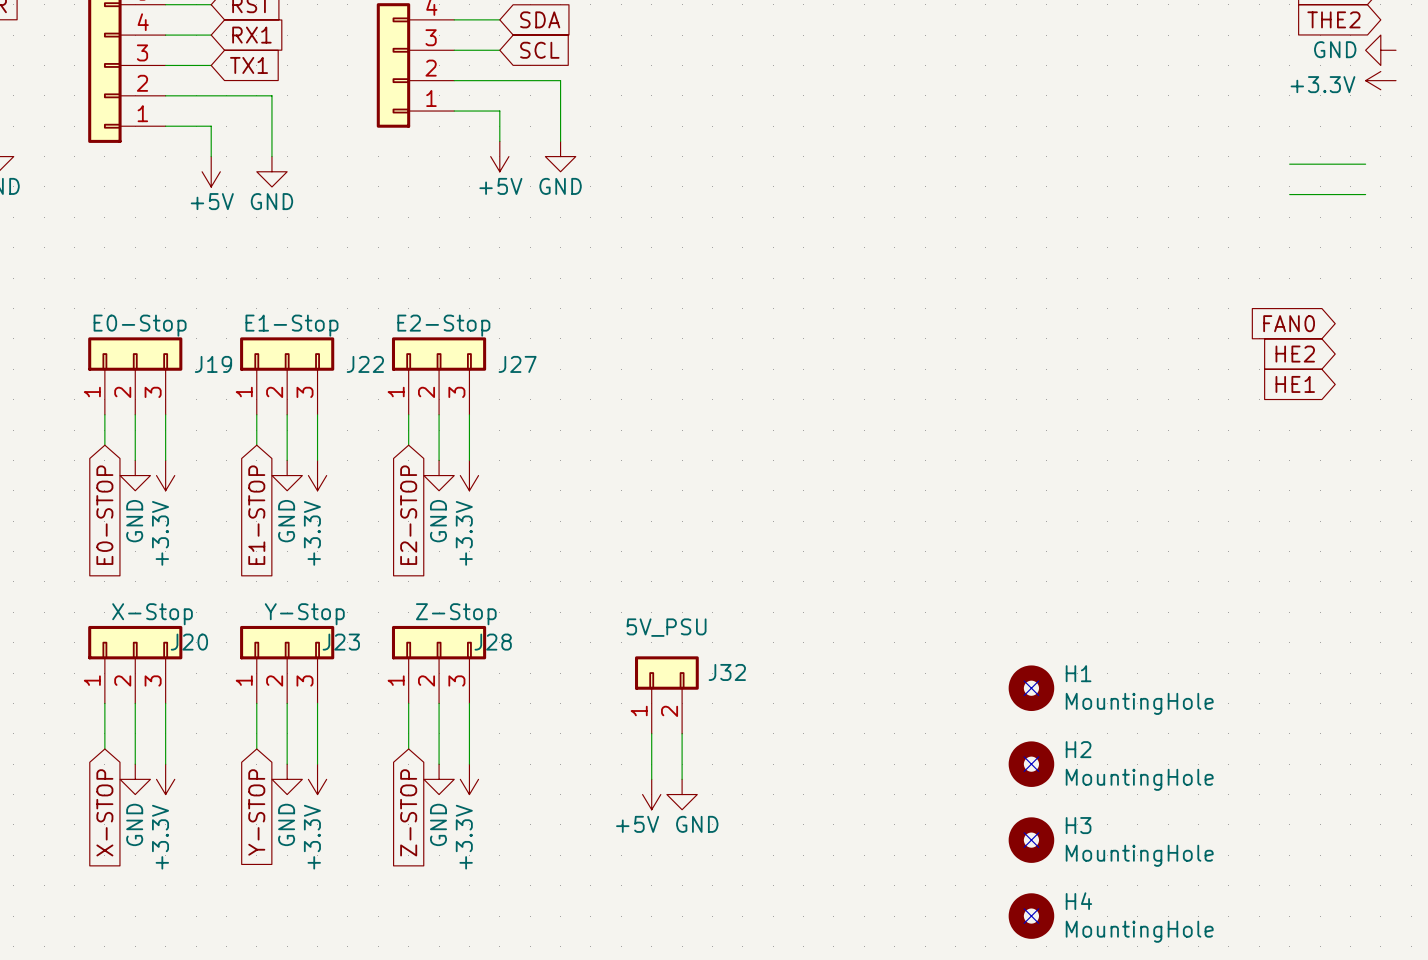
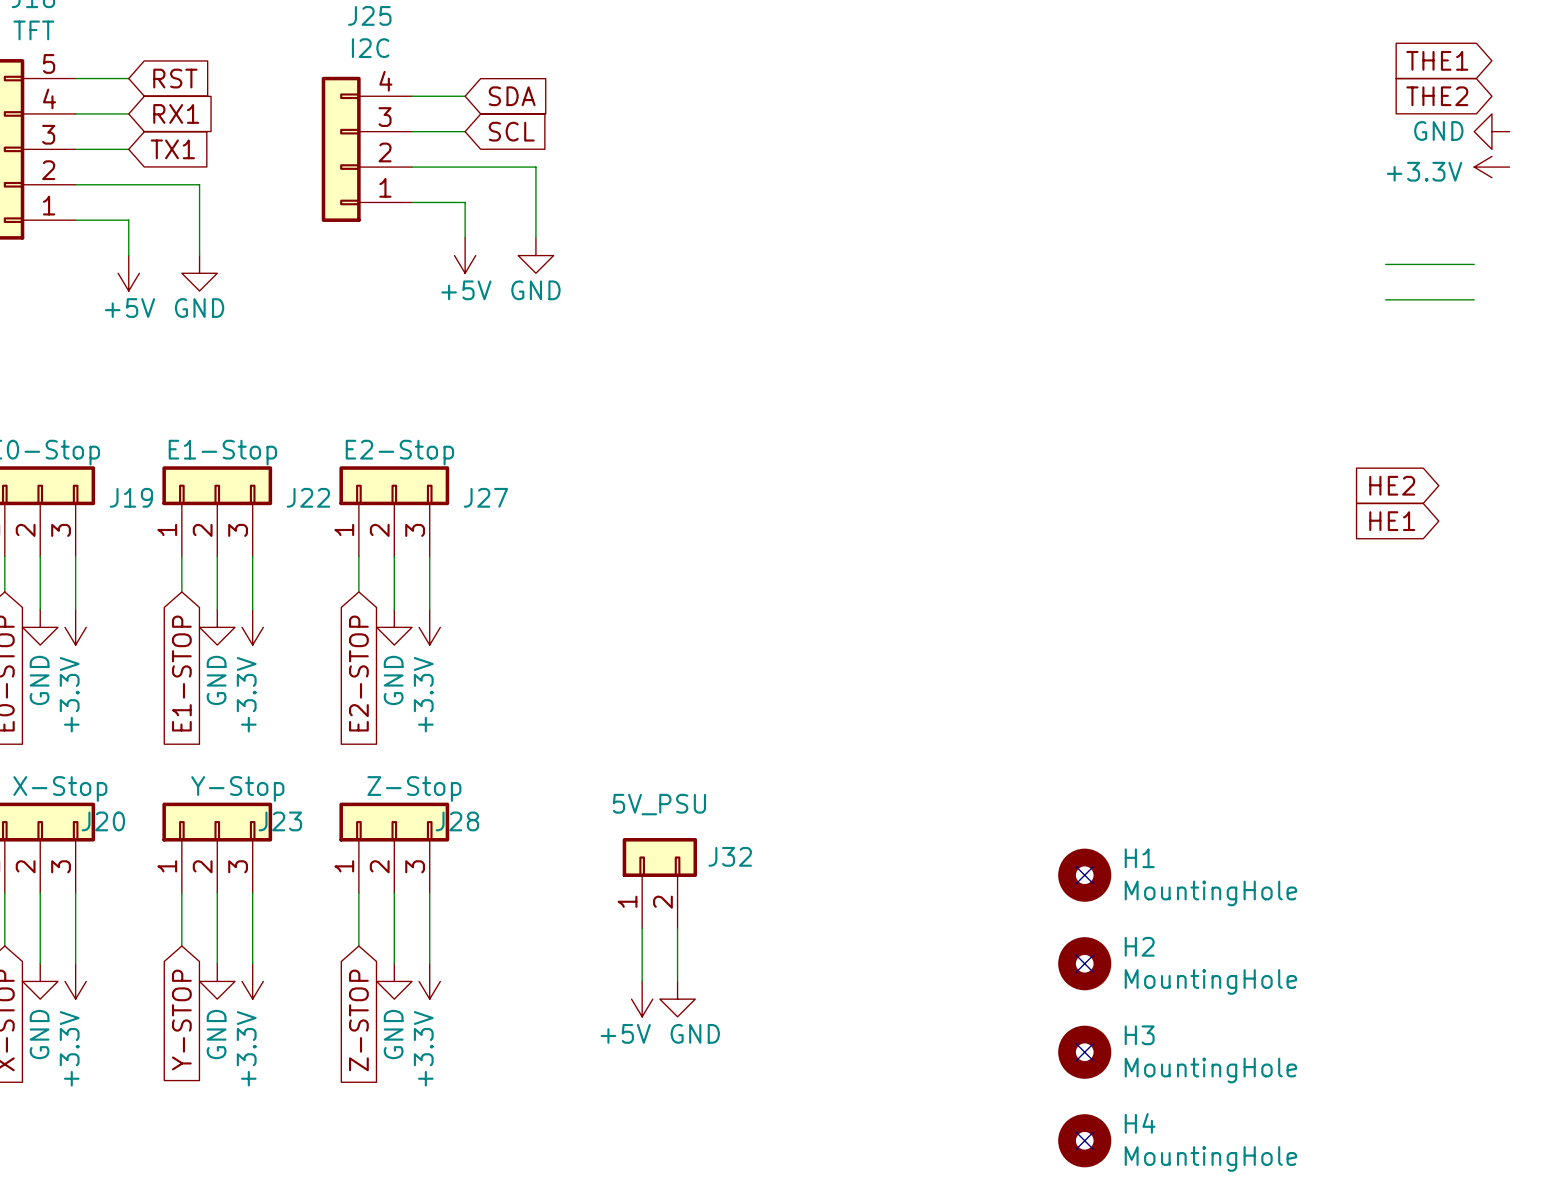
global label: FAN0 (1289, 323) -> none

